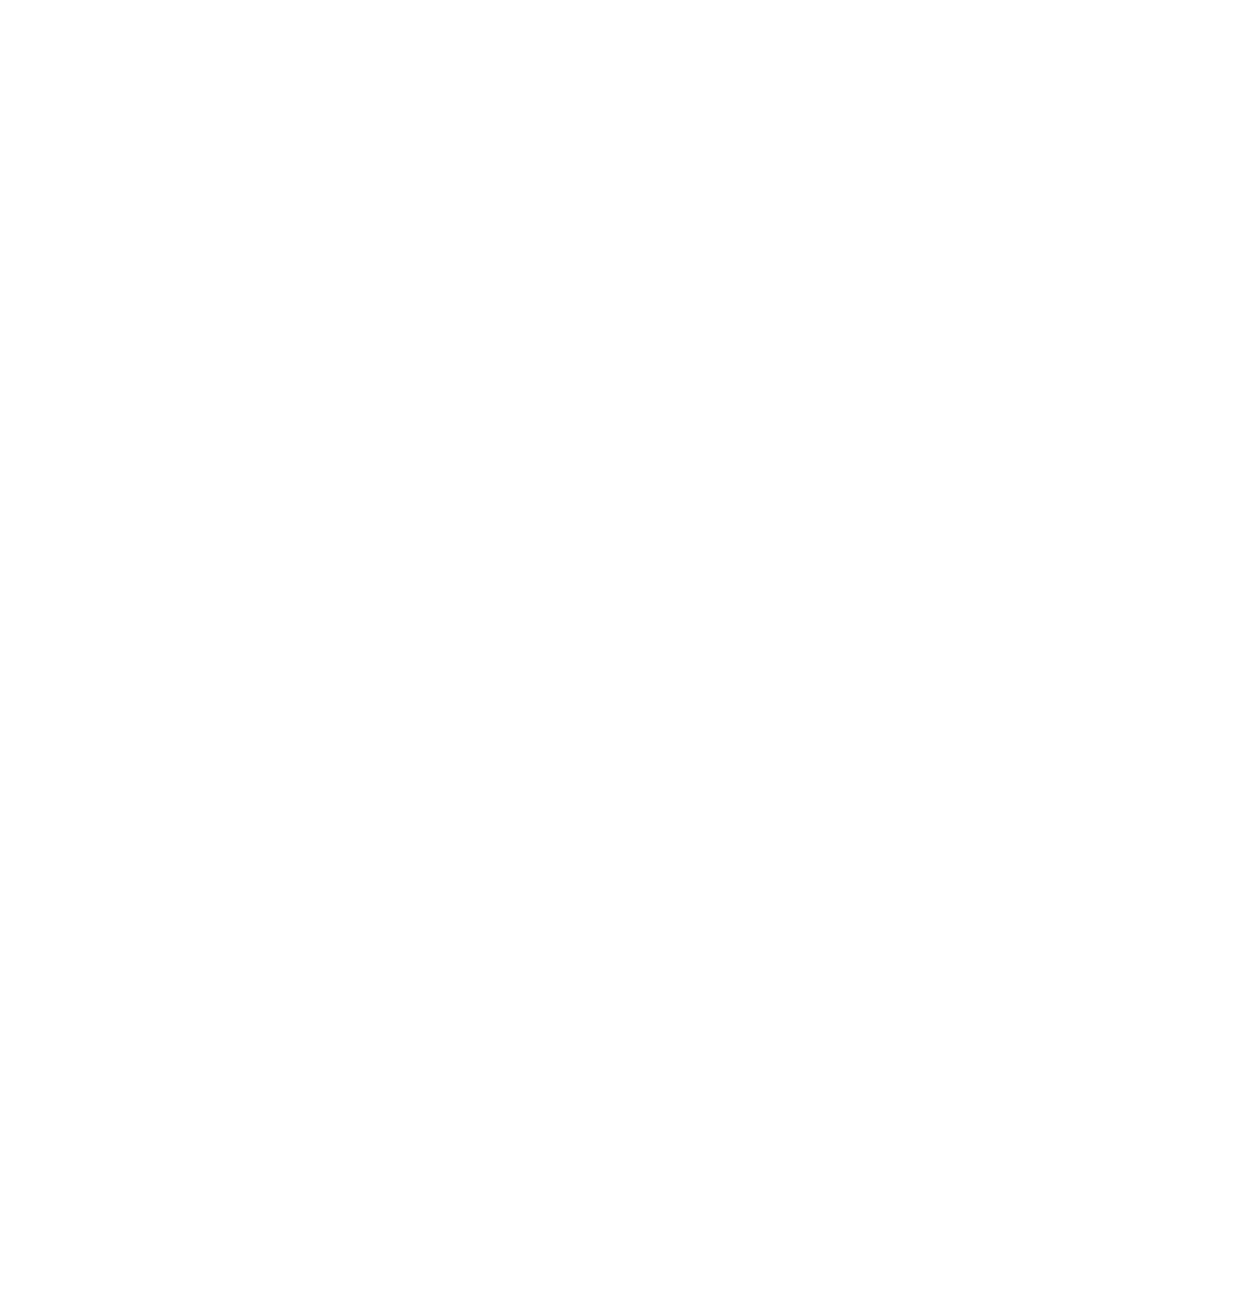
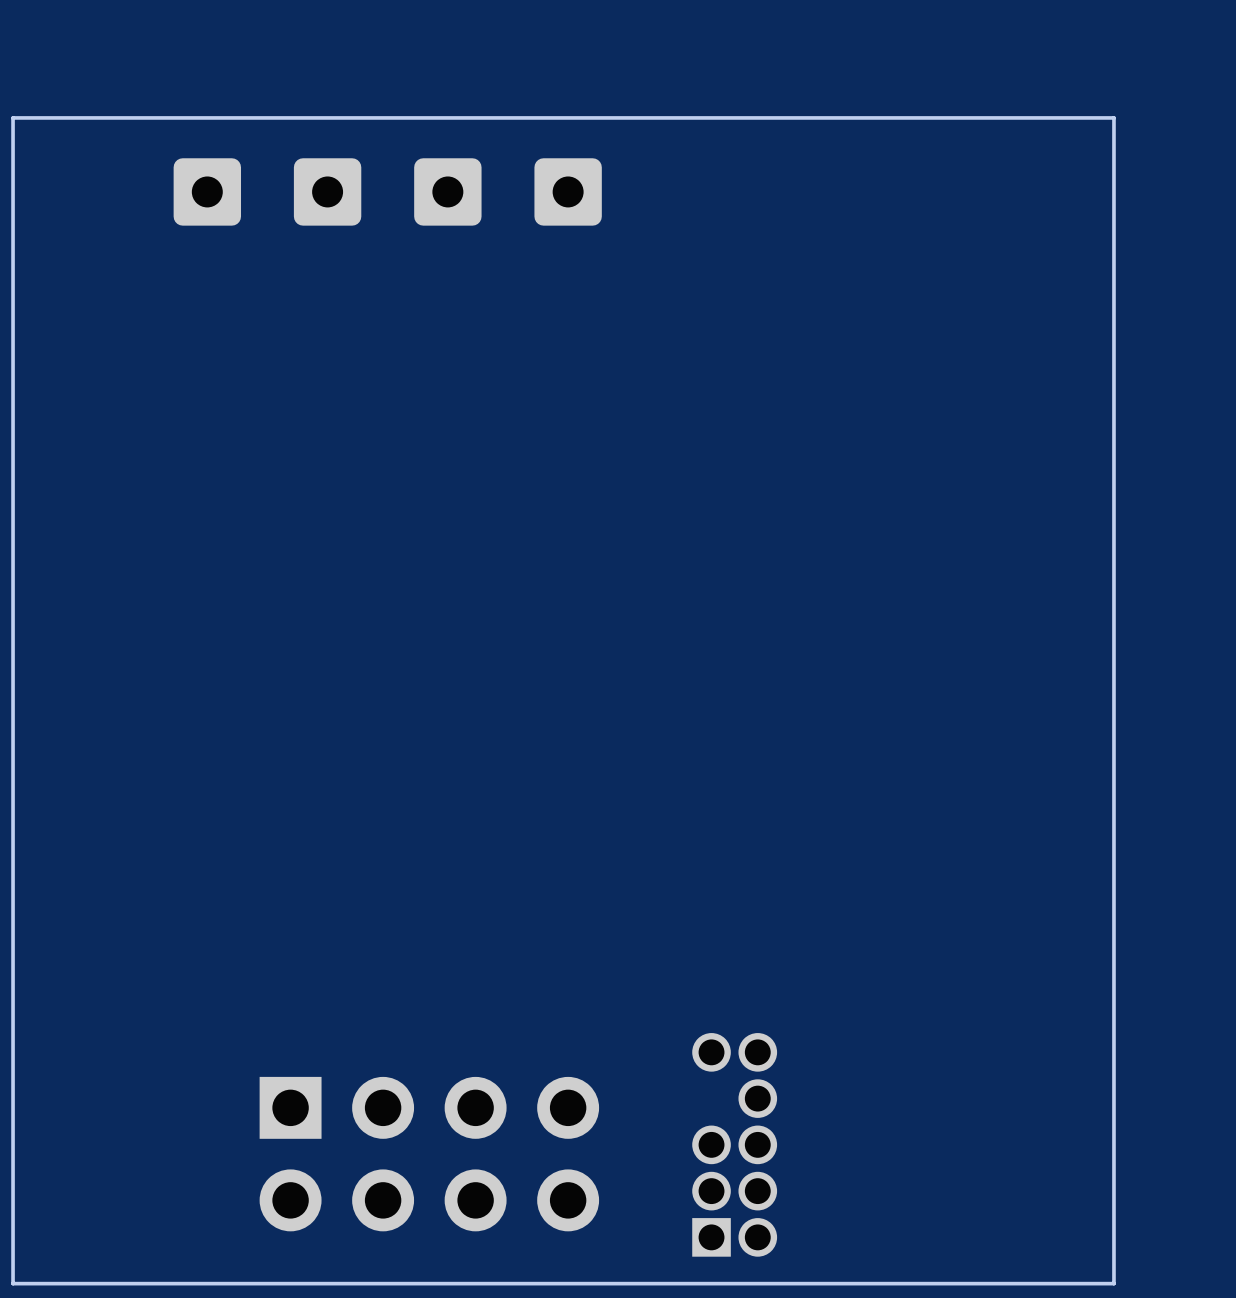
board edge: none -> (1113, 117) (13, 117) (13, 1283) (1113, 1283) (1113, 117)
part: none -> (207, 191)
part: none -> (327, 191)
part: none -> (447, 191)
part: none -> (568, 191)
part: none -> (734, 1144)
part: none -> (429, 1154)

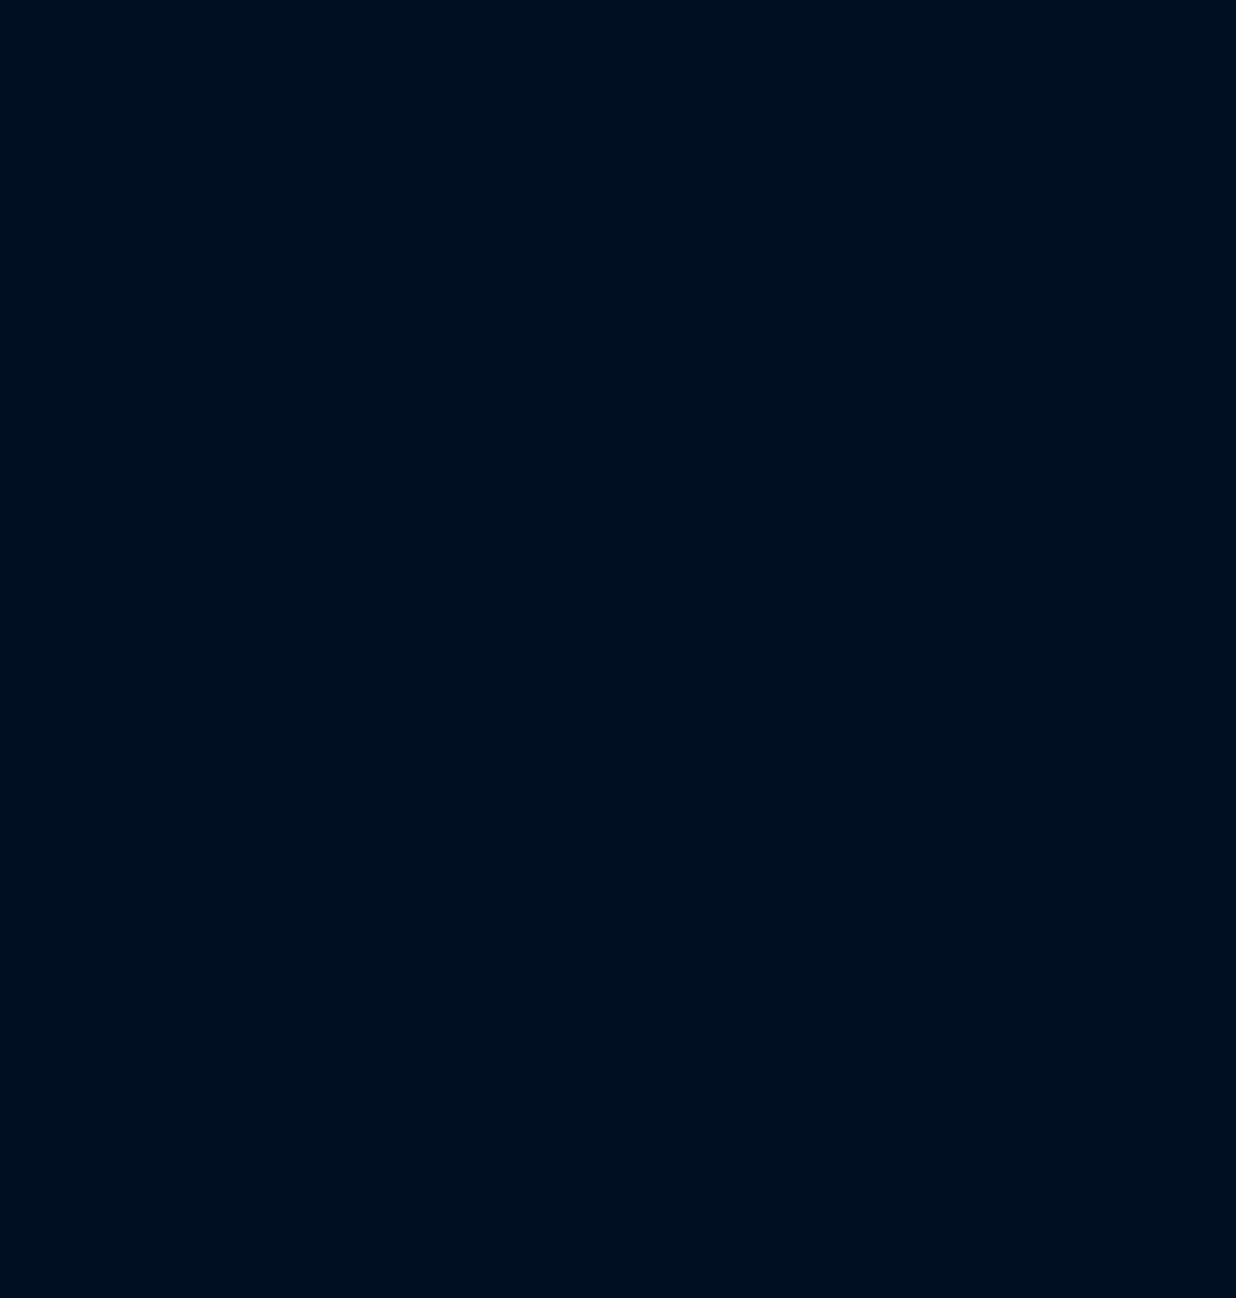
board edge: (1113, 117) (13, 117) (13, 1283) (1113, 1283) (1113, 117) -> none
part: (207, 191) -> none
part: (327, 191) -> none
part: (447, 191) -> none
part: (568, 191) -> none
part: (734, 1144) -> none
part: (429, 1154) -> none

